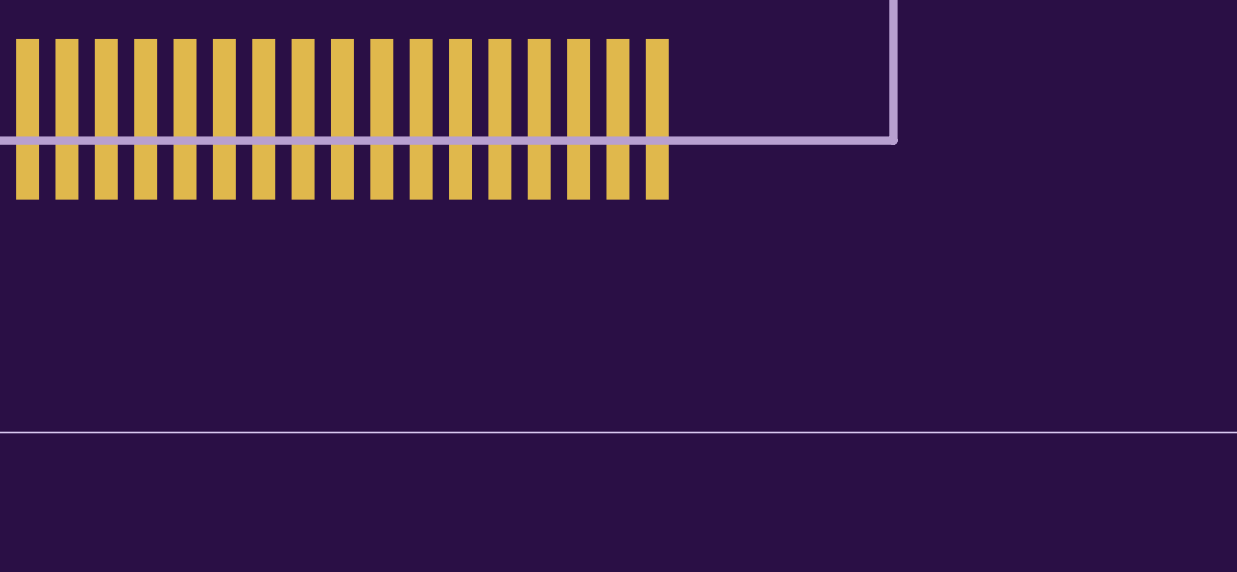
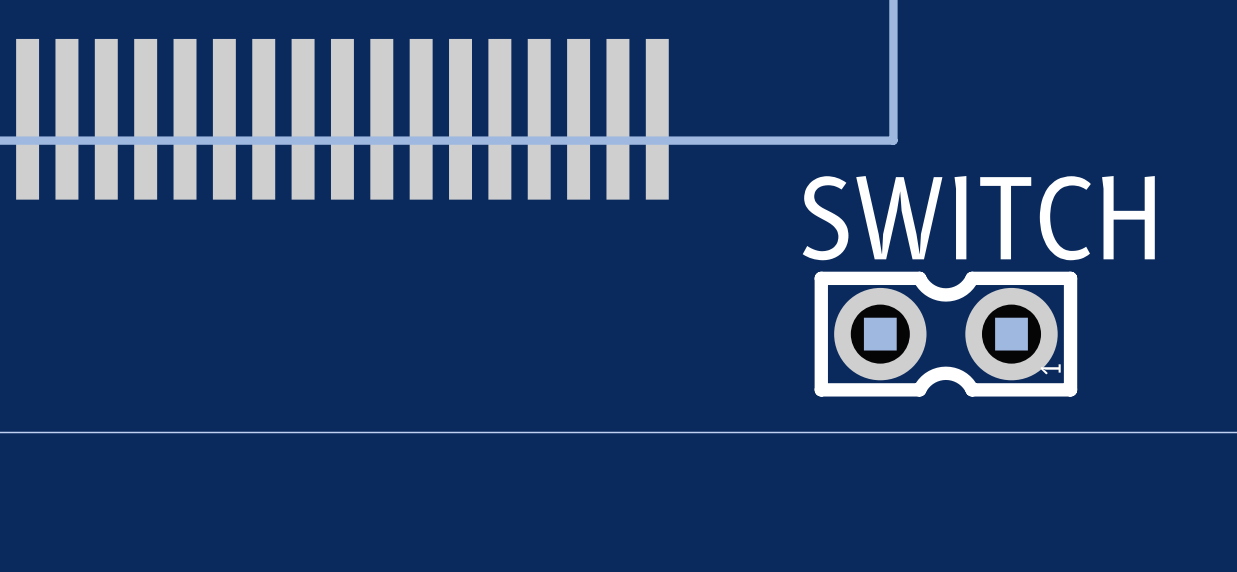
SWITCH: none -> (945, 334)

